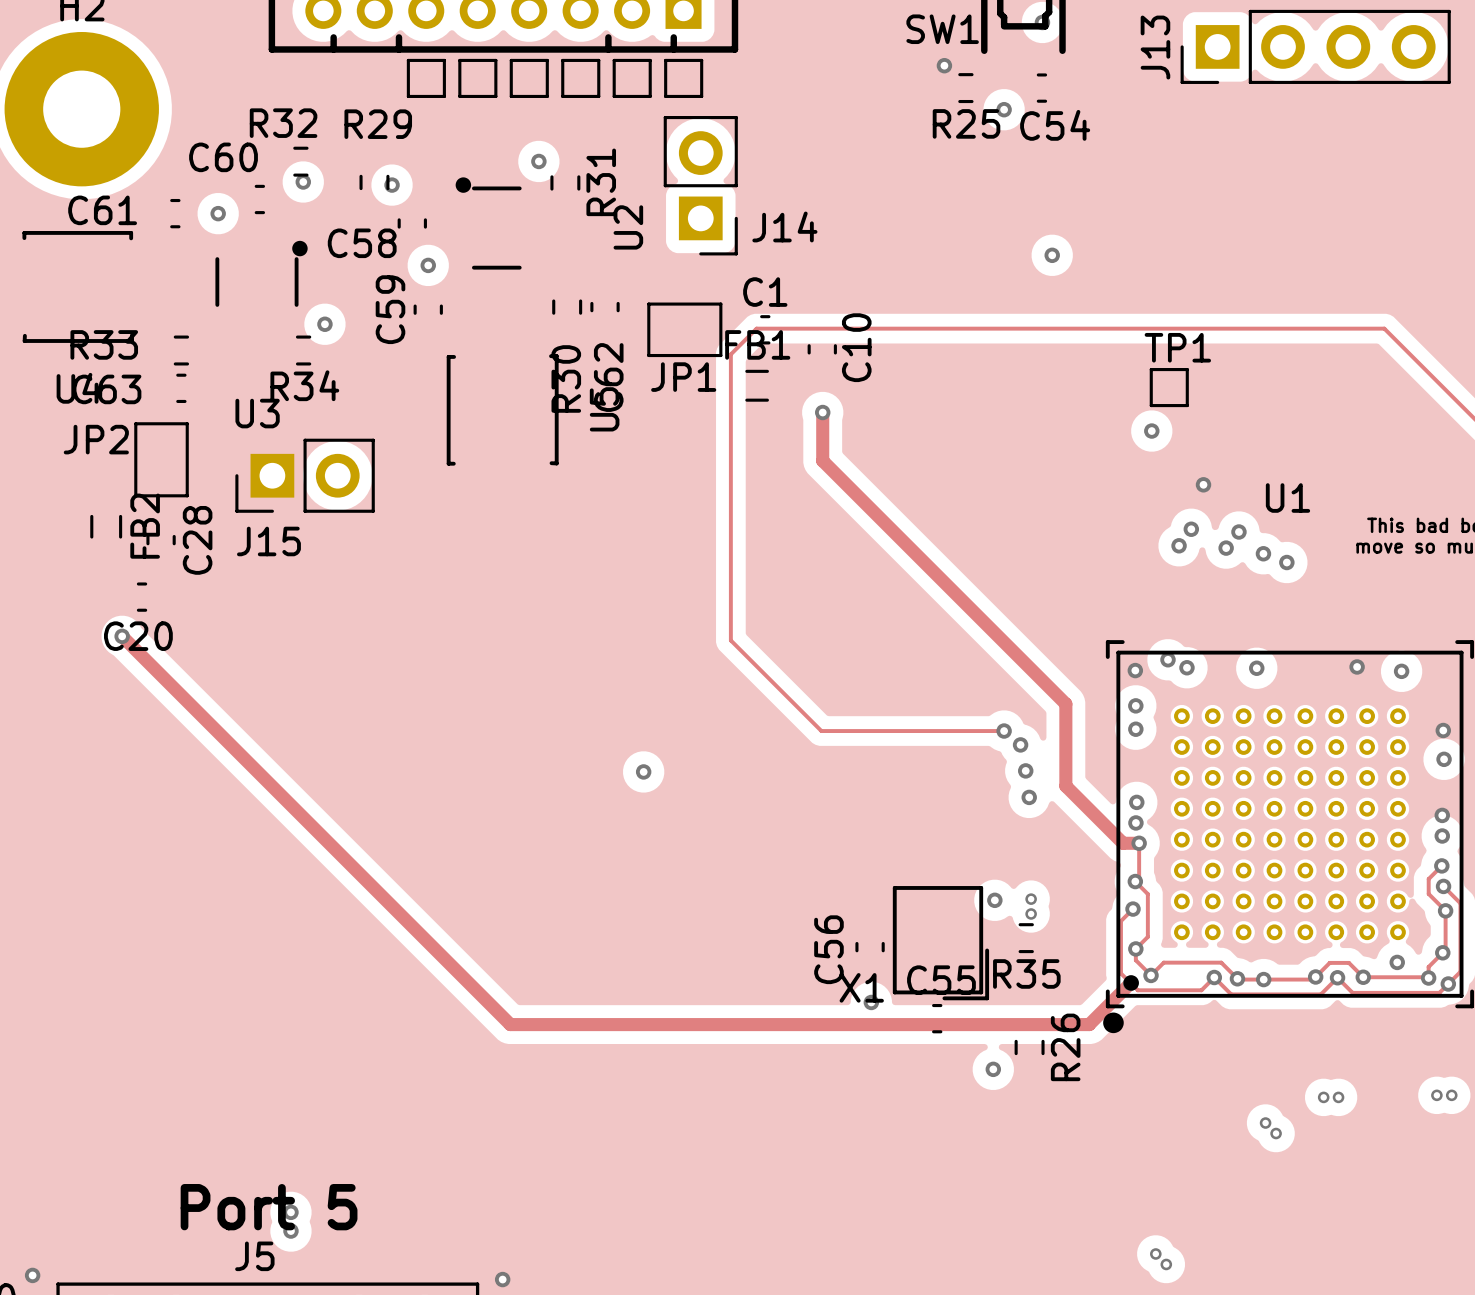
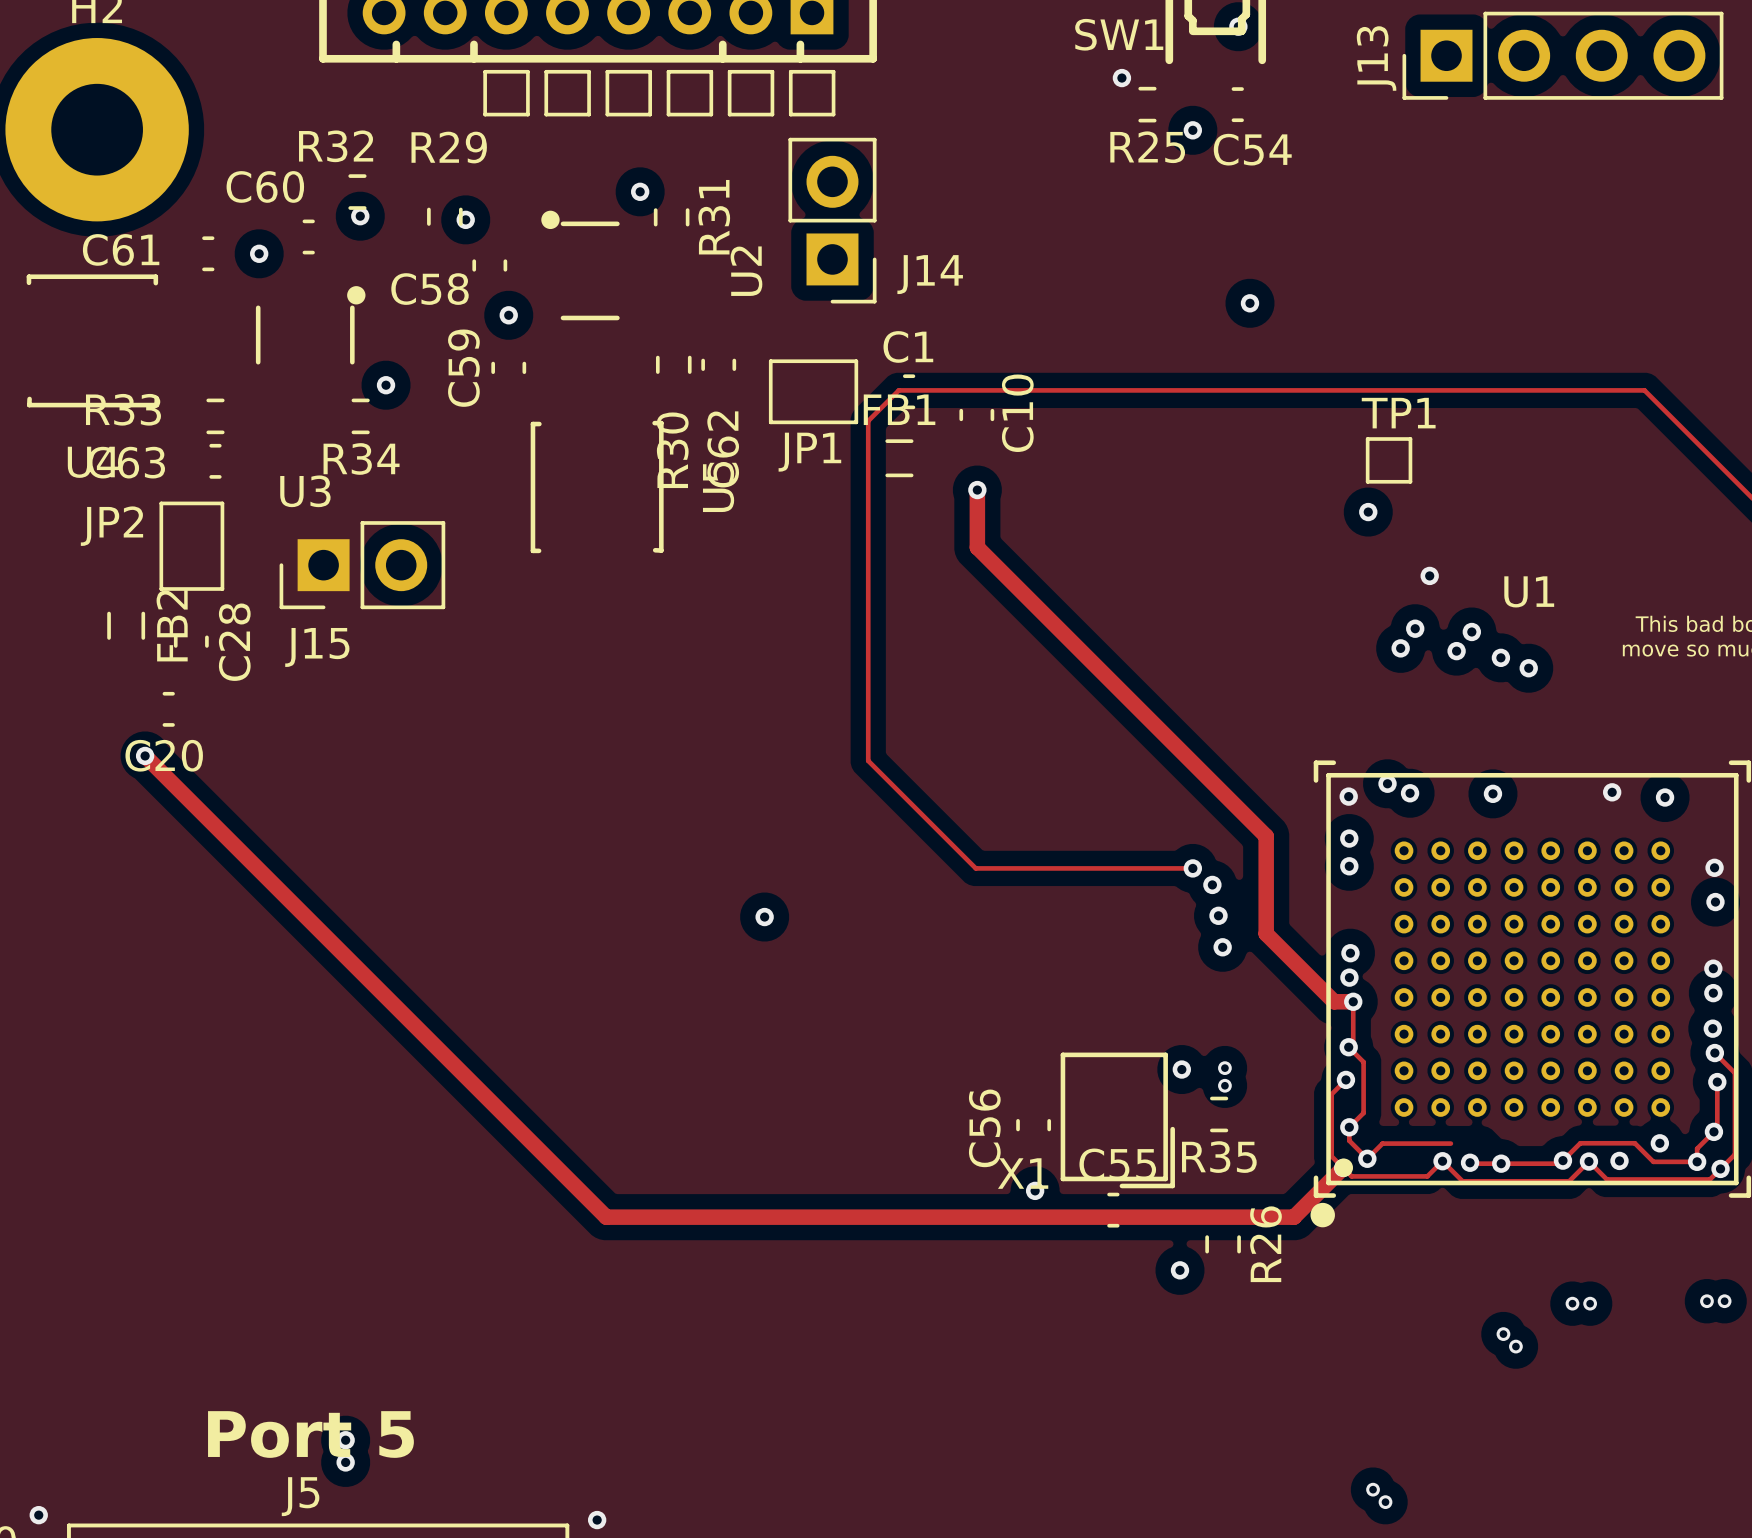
track: (1441, 865) (1428, 879) (1428, 893) (1445, 910) -> none
track: (1221, 962) (1237, 978) -> none
track: (1329, 962) (1348, 962) (1363, 977) (1427, 977) -> (1579, 1143) (1634, 1143) (1653, 1161) (1697, 1161)

